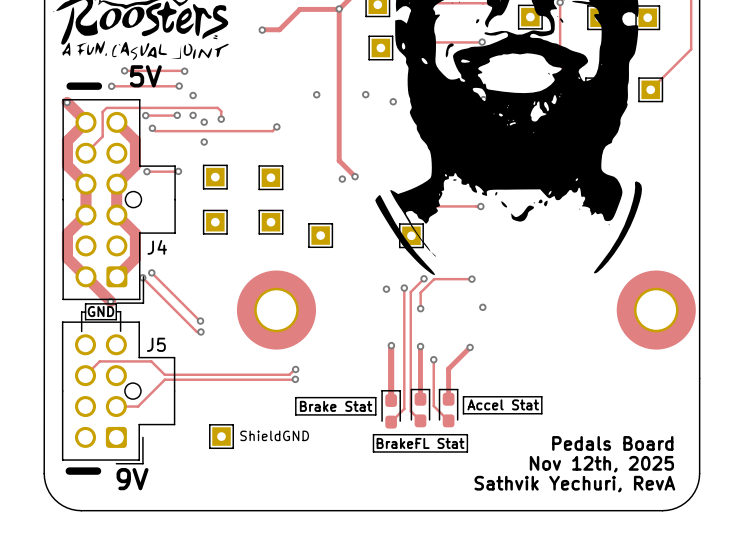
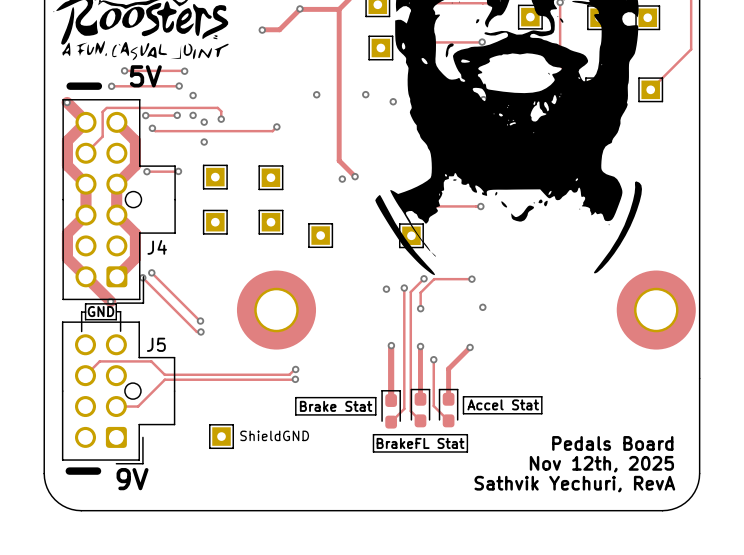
via position: (339, 8) -> (299, 8)

